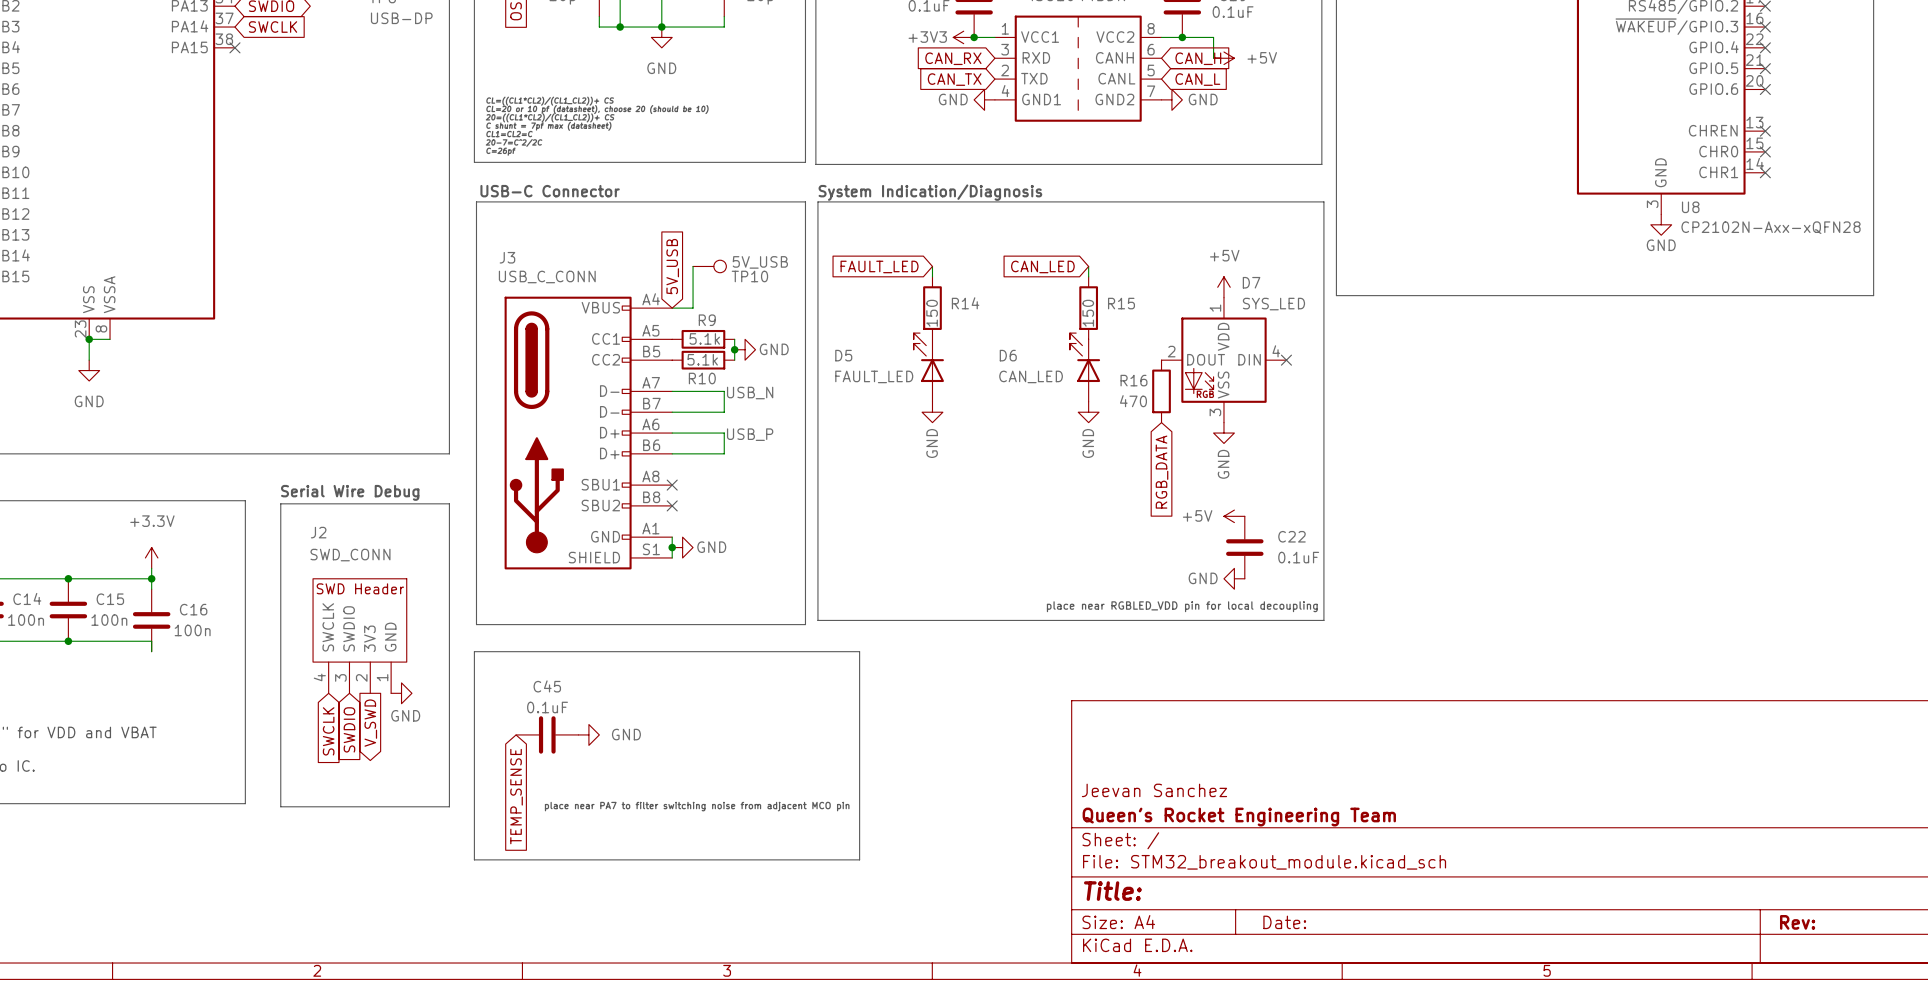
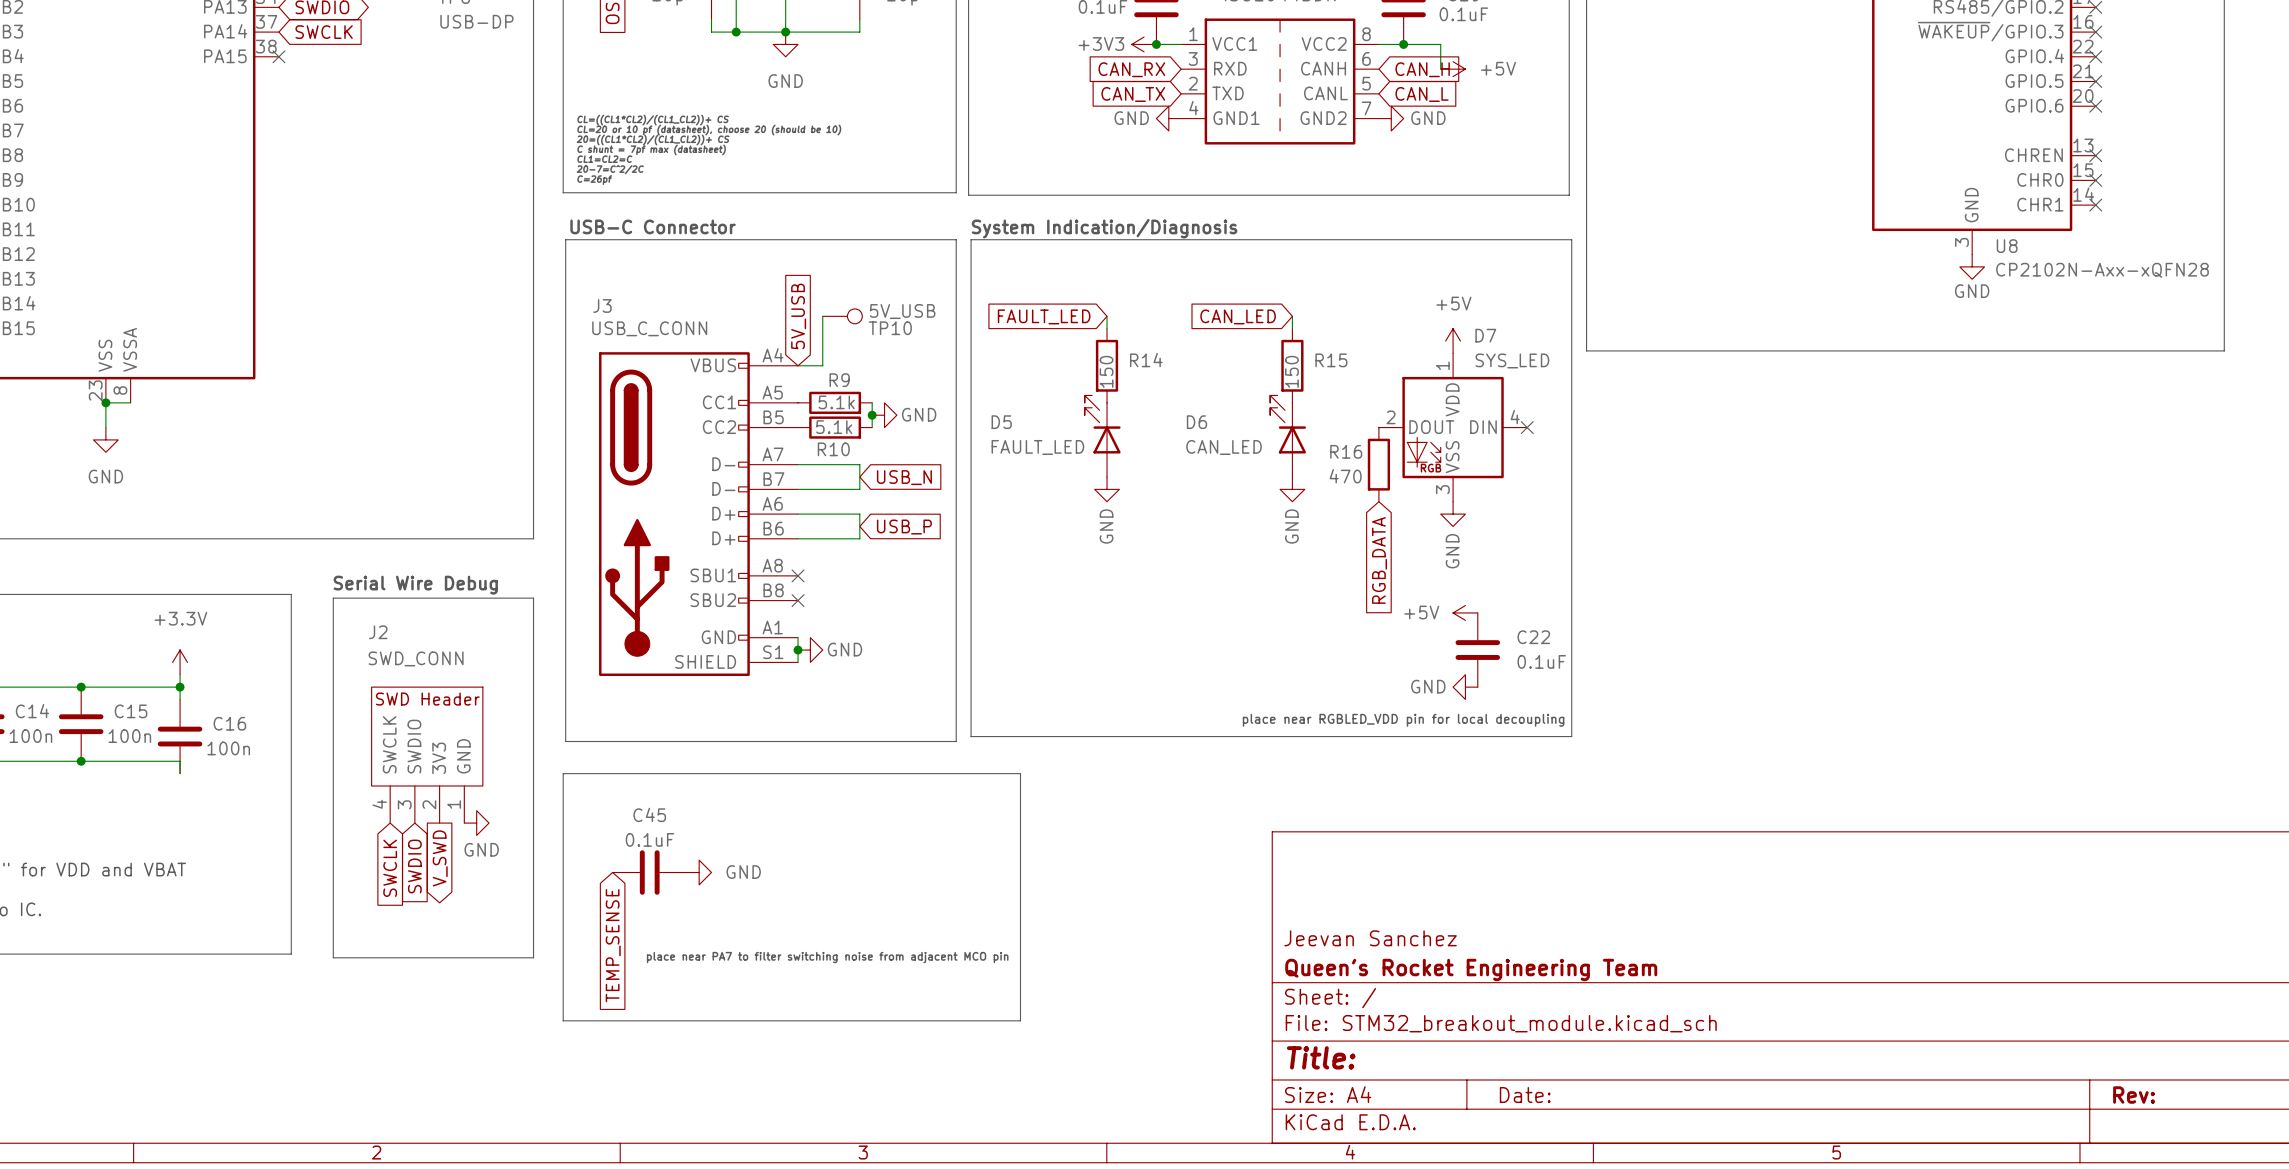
label: USB_N (750, 393) -> none
global label: none -> USB_N (904, 477)
label: USB_P (750, 434) -> none
global label: none -> USB_P (904, 527)

